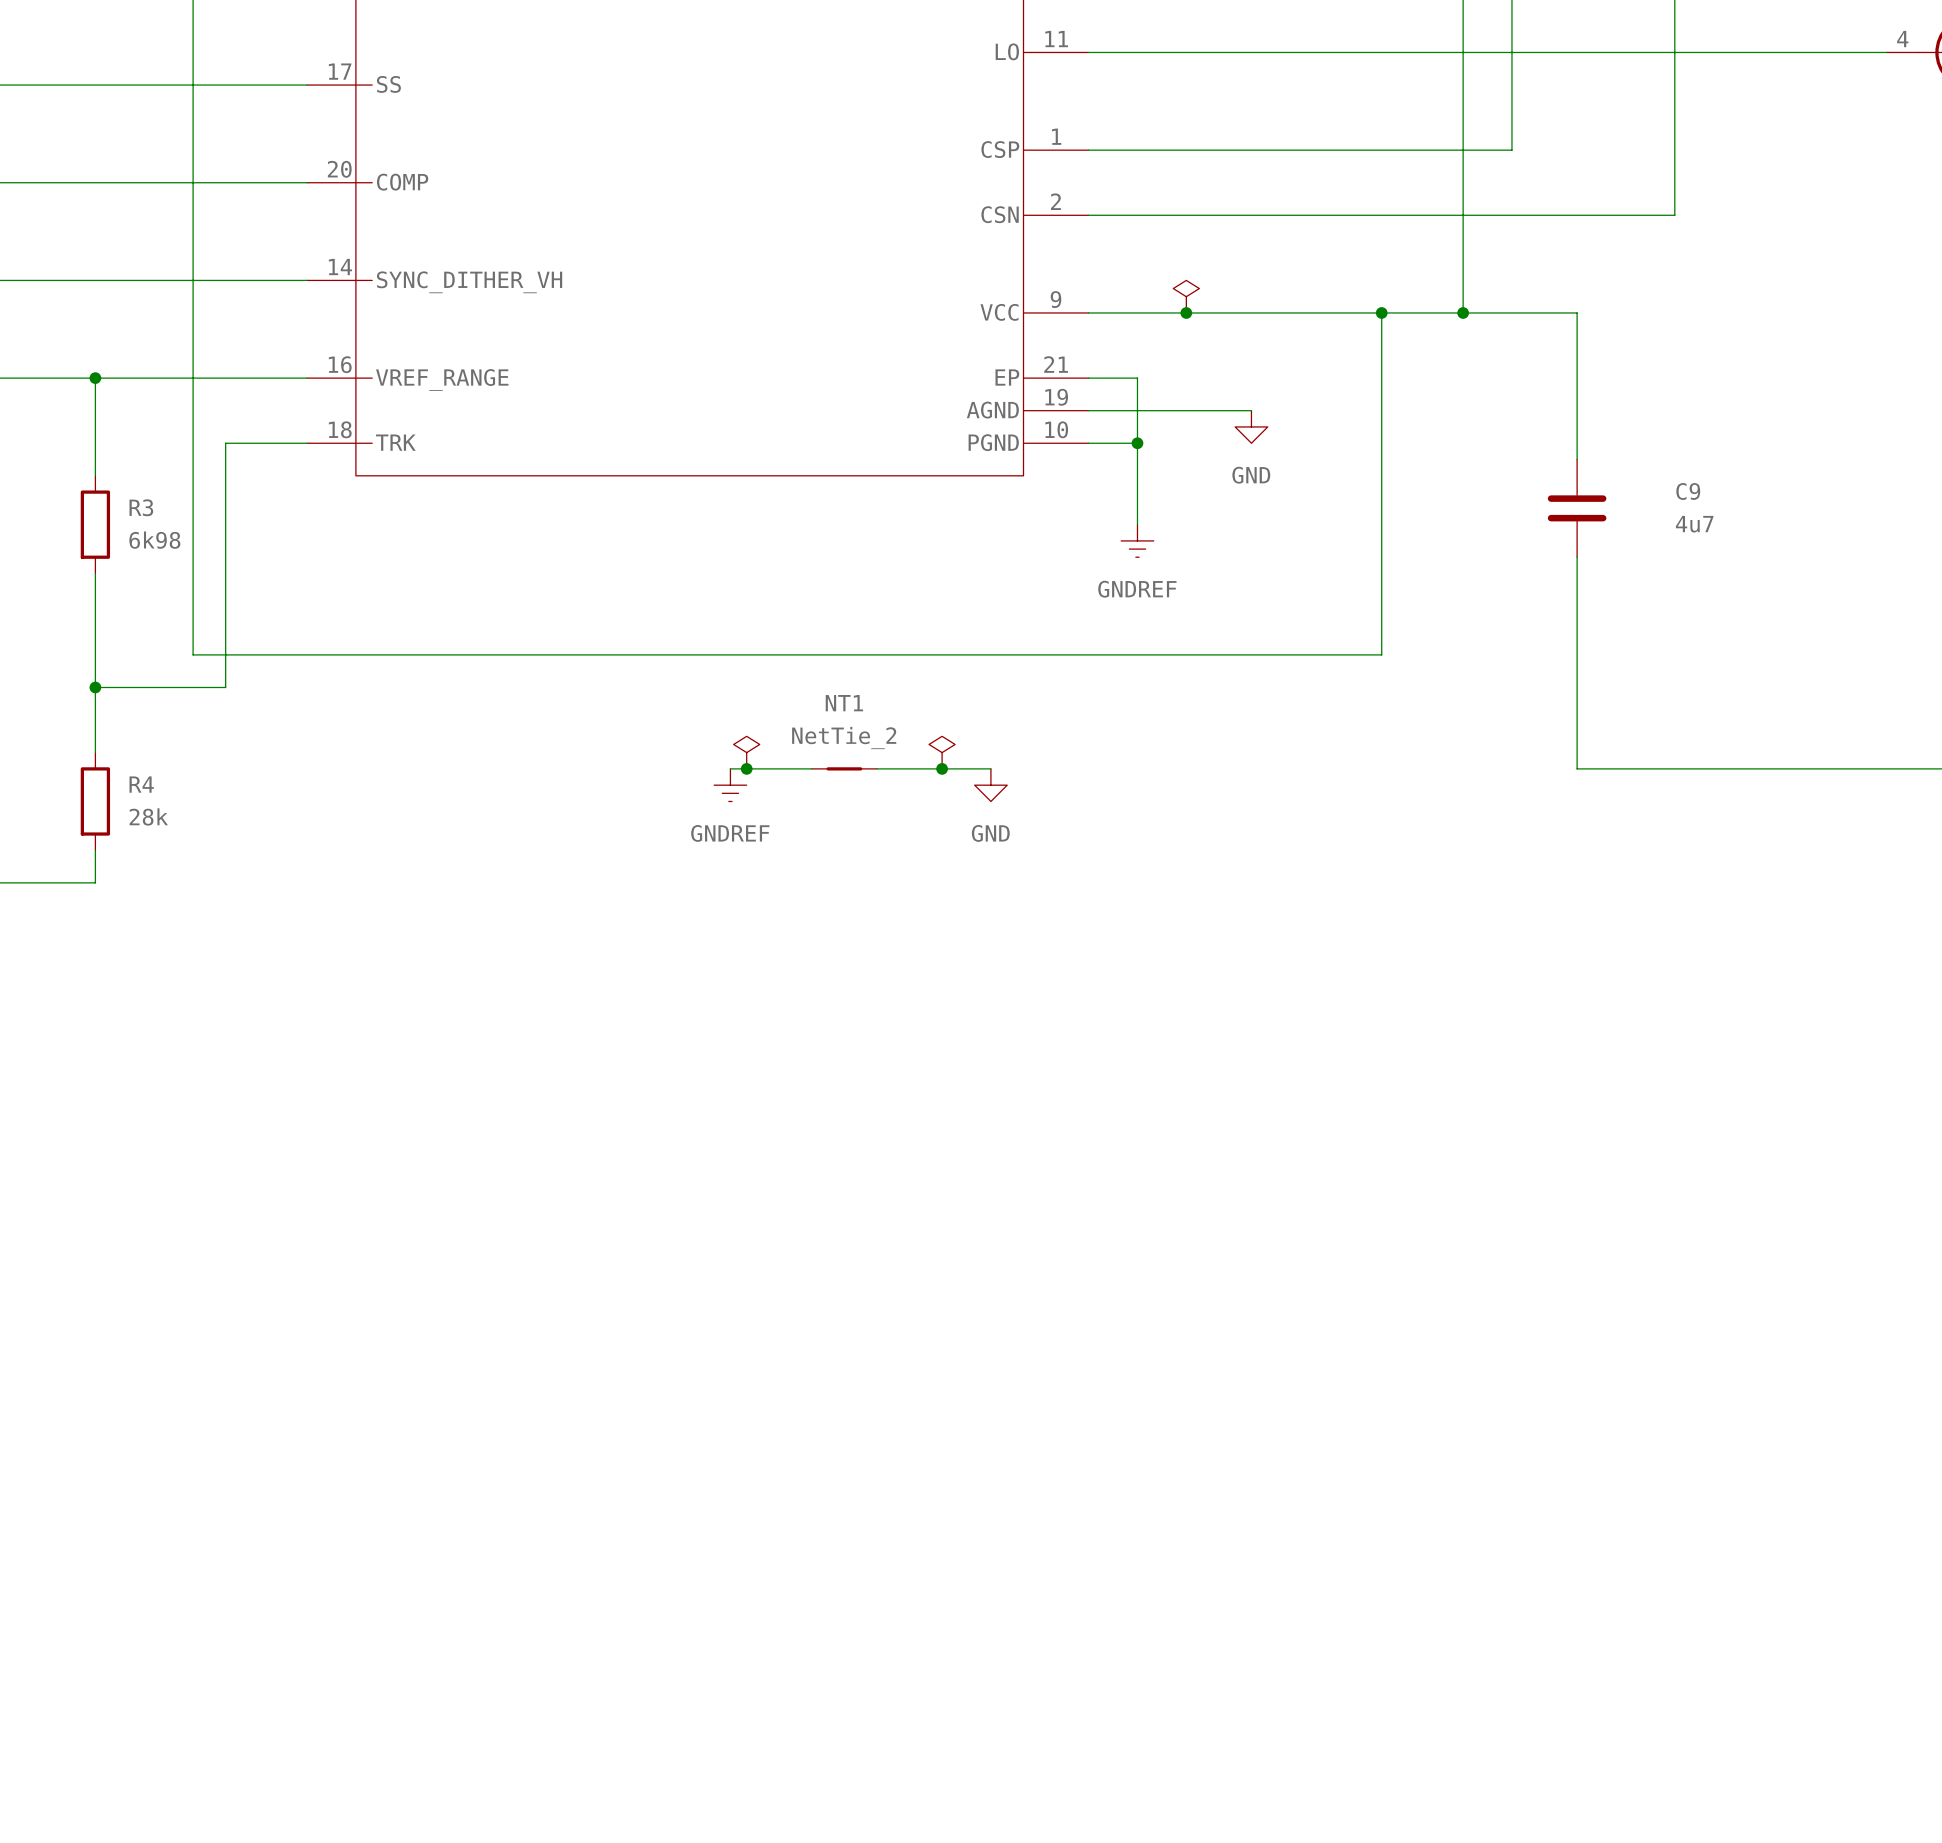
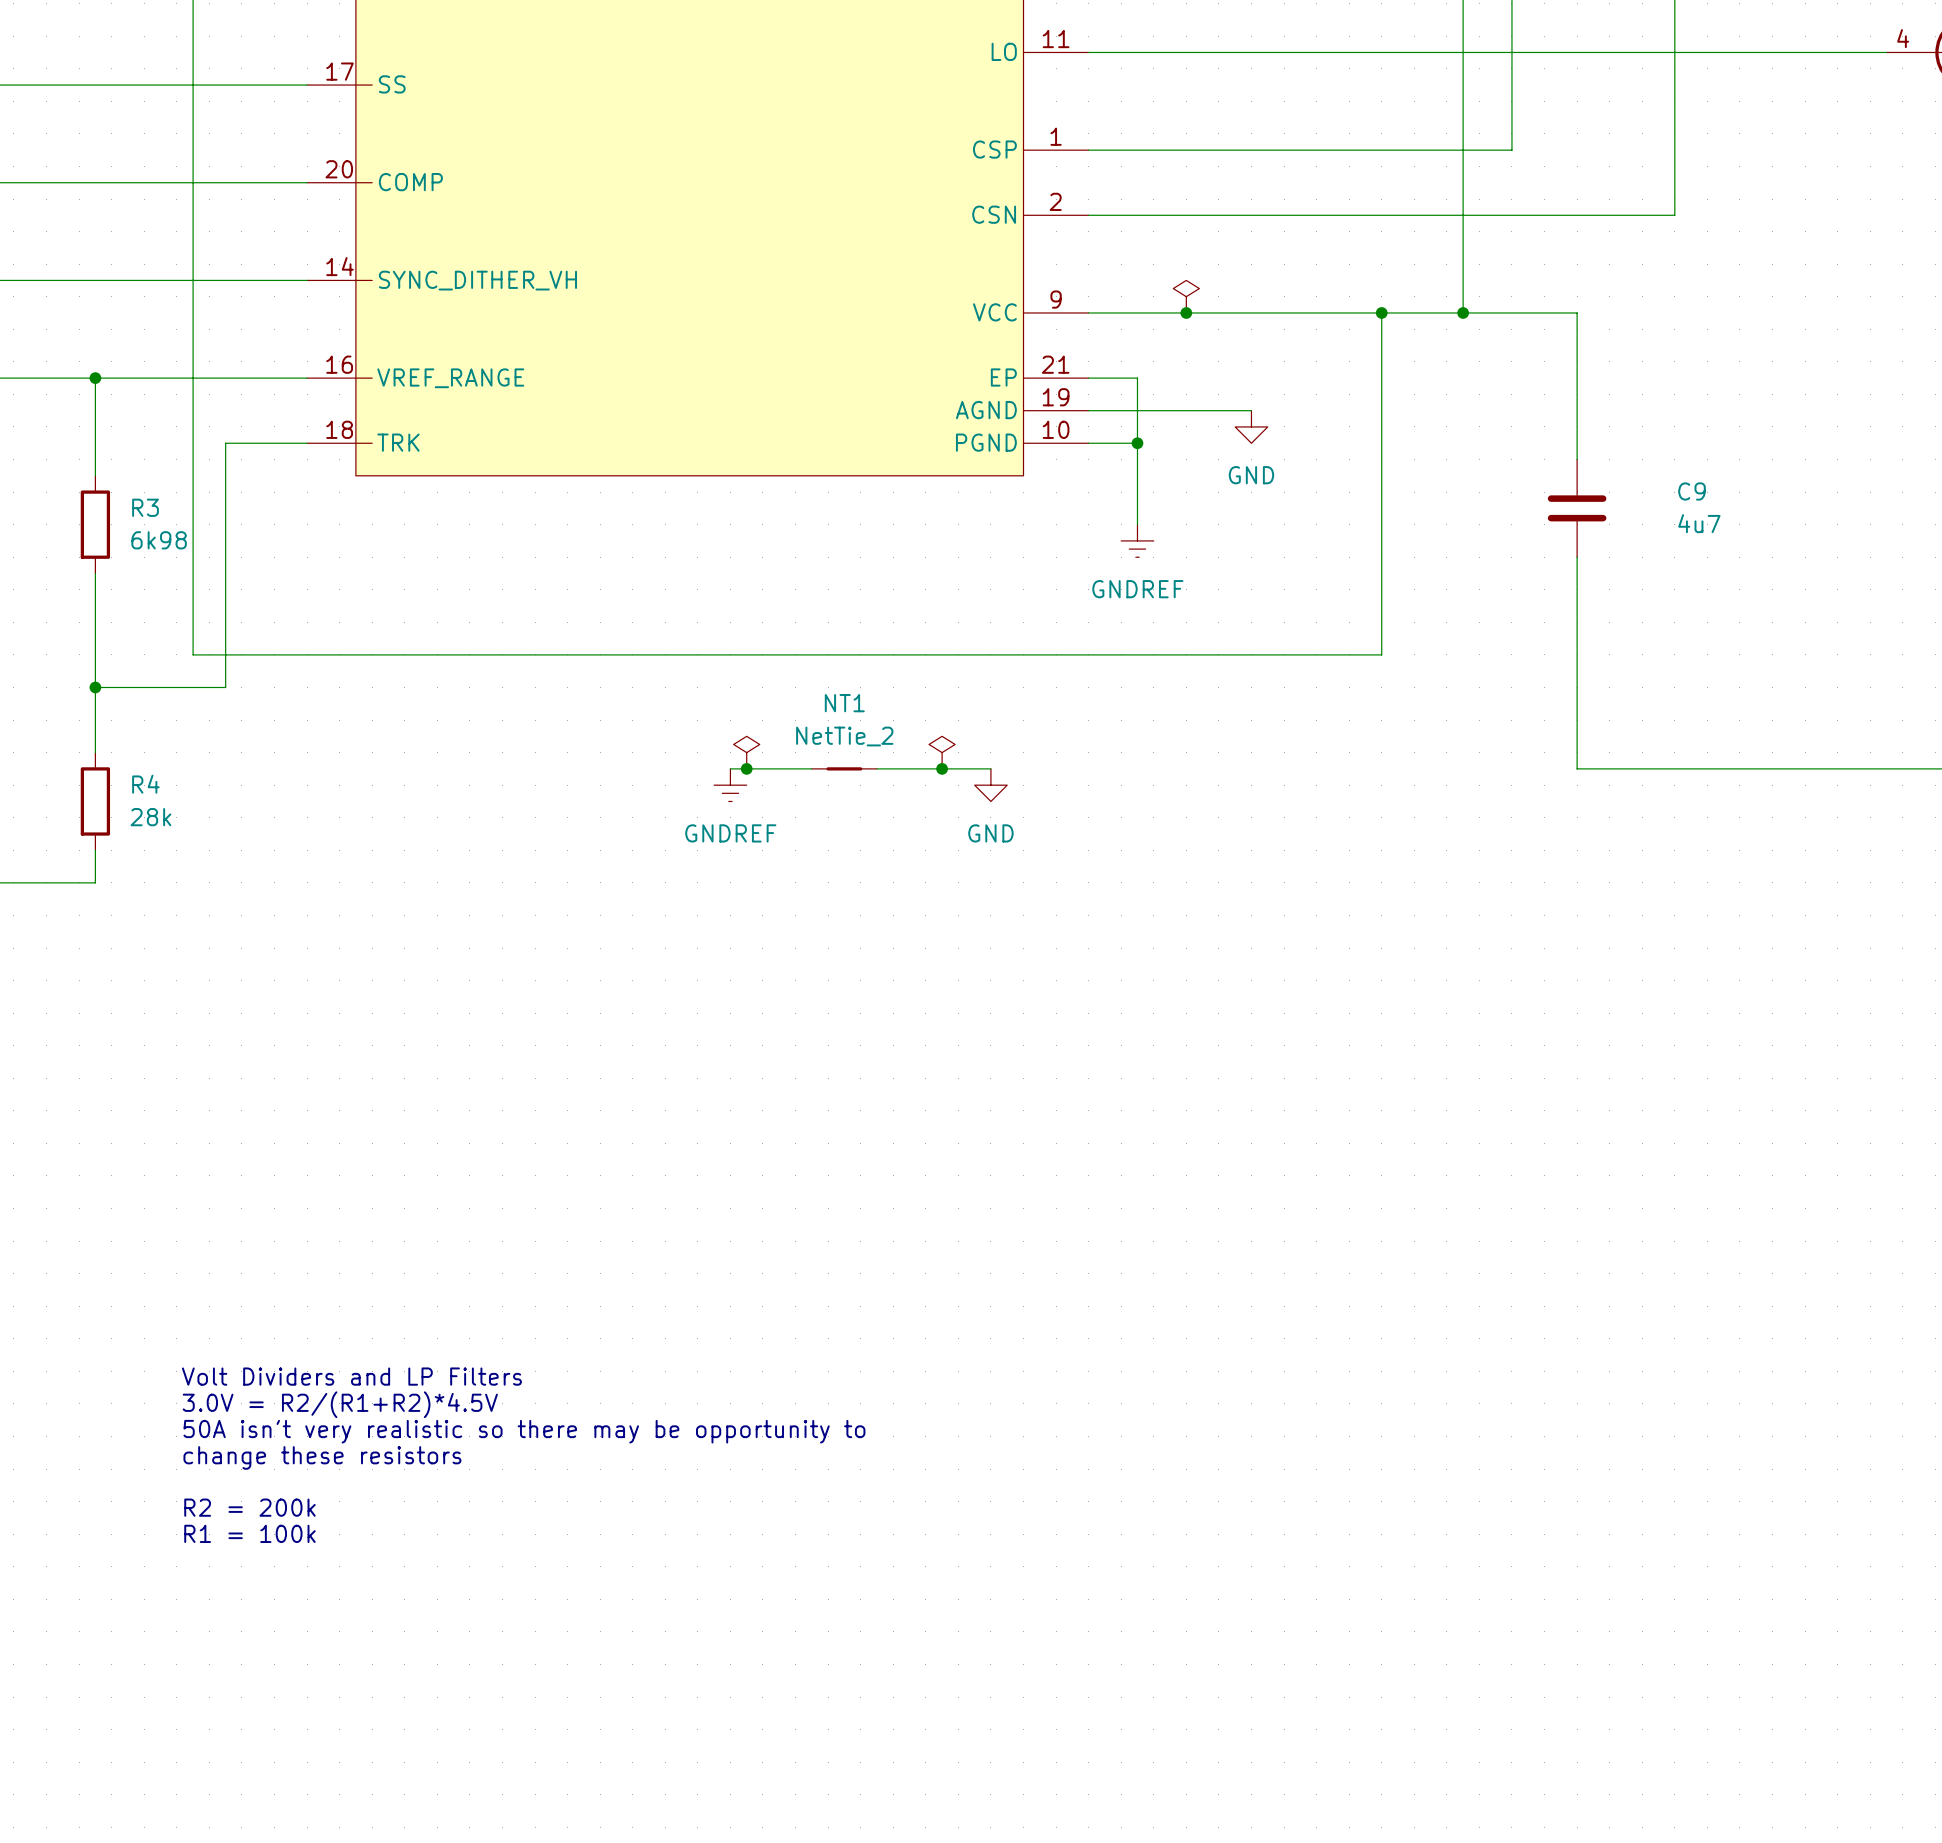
text: none -> Volt Dividers and LP Filters (351, 1376)
text: none -> 3.0V = R2/(R1+R2)*4.5V (340, 1404)
text: none -> 50A isn't very realistic so there may be opportunity to (524, 1431)
text: none -> change these resistors (322, 1457)
text: none -> R2 = 200k (249, 1507)
text: none -> R1 = 100k (249, 1533)

